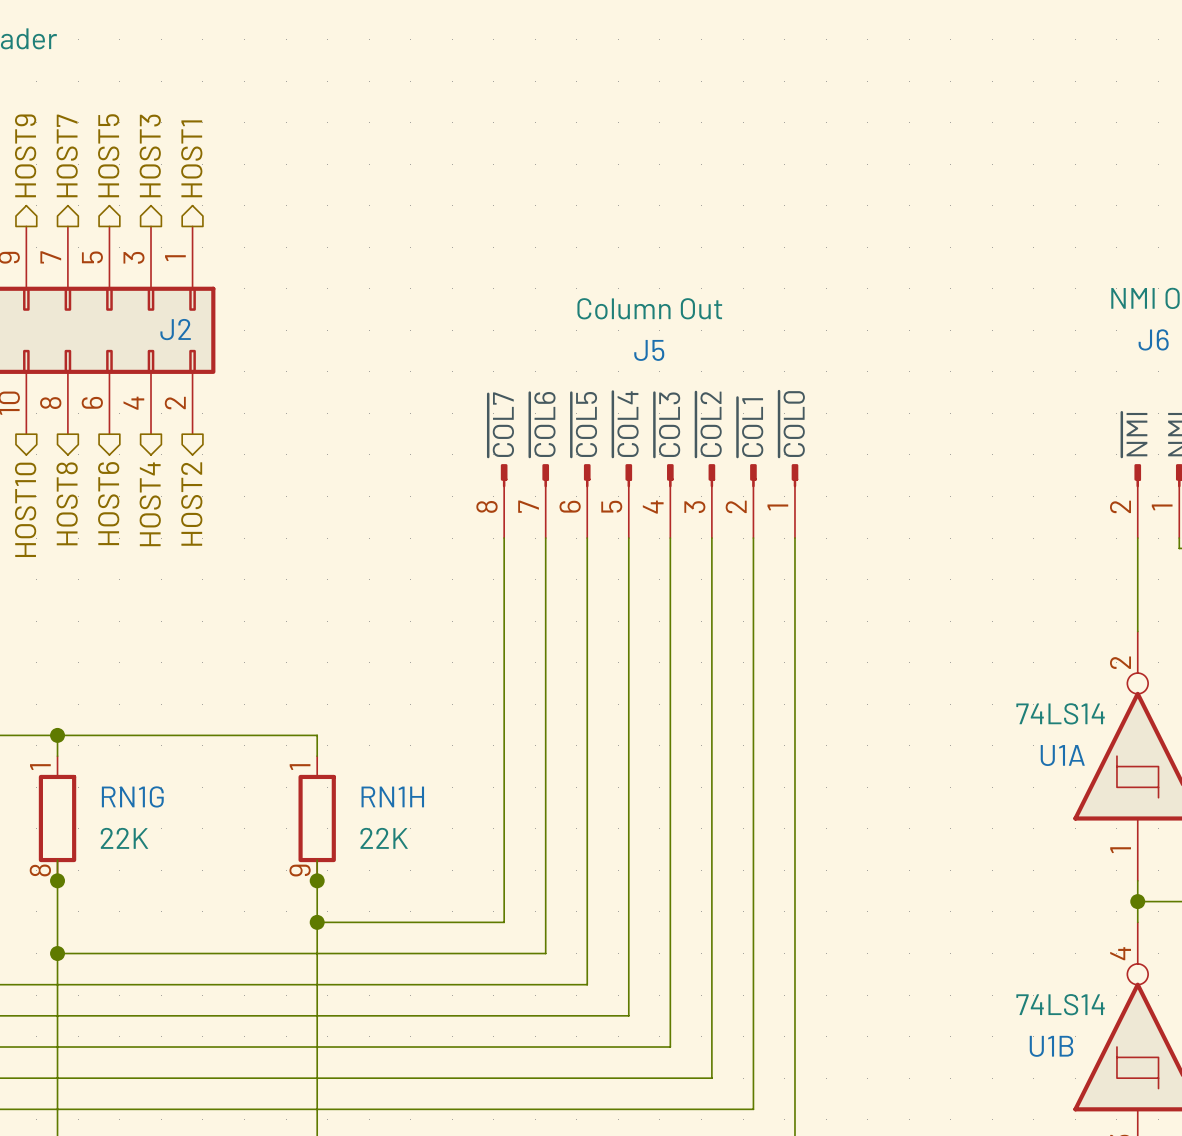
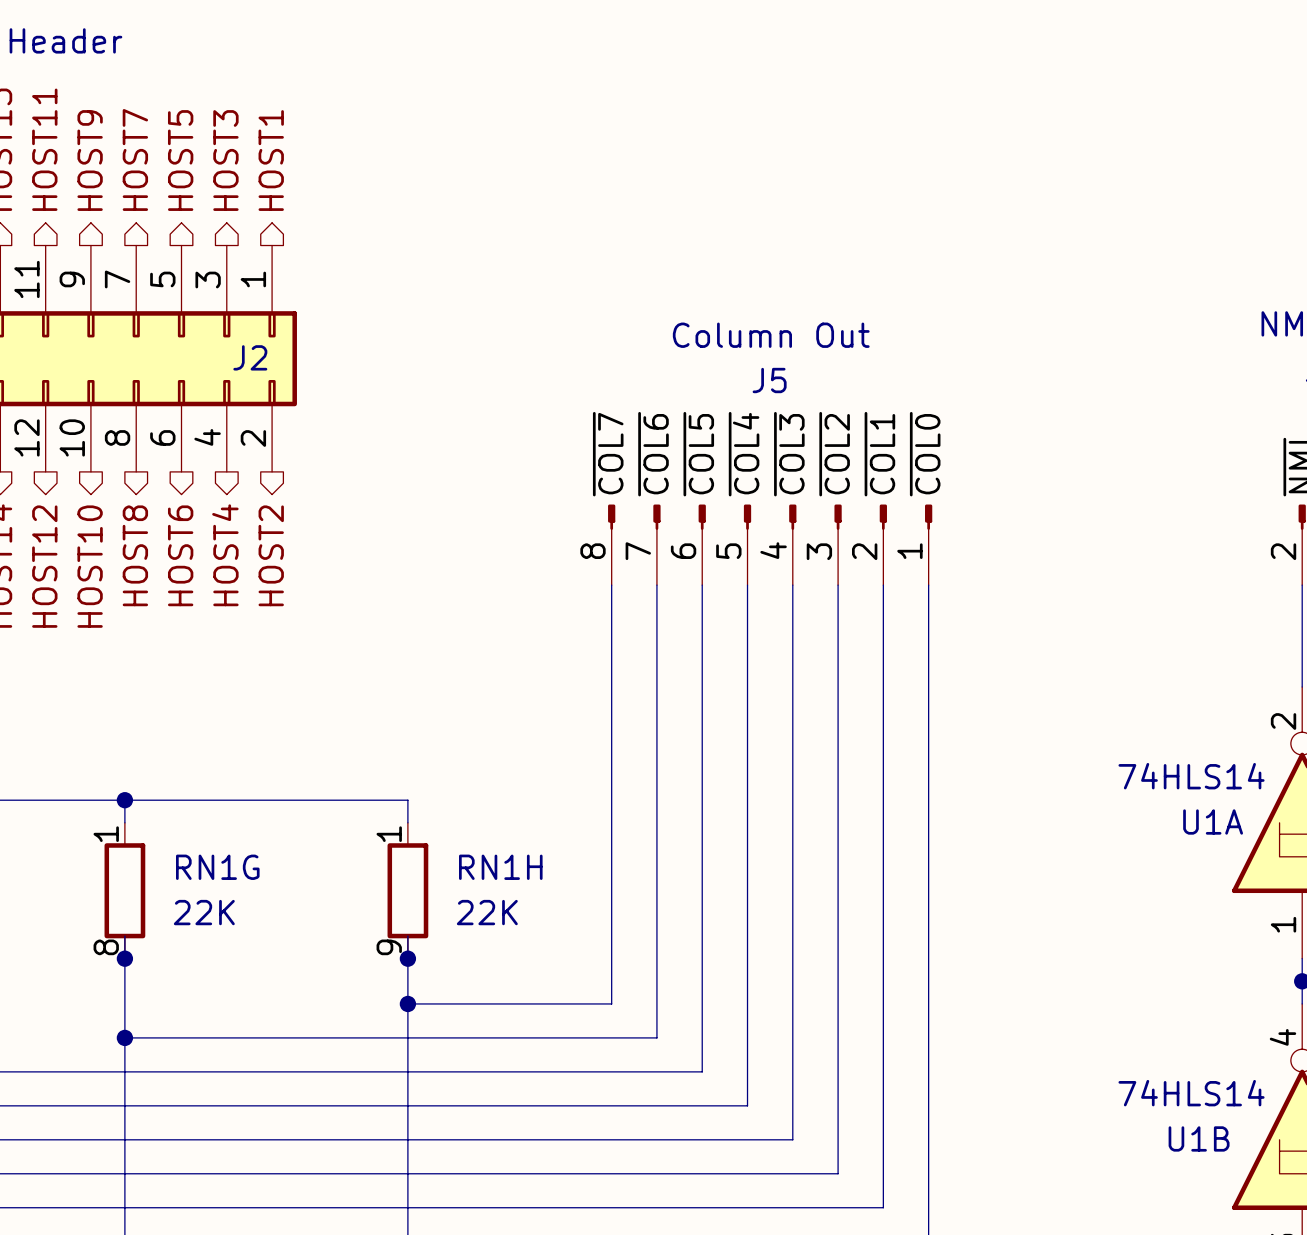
U1A value: 74LS14 (1060, 713) -> 74HLS14 (1191, 776)
U1B value: 74LS14 (1060, 1004) -> 74HLS14 (1191, 1093)

